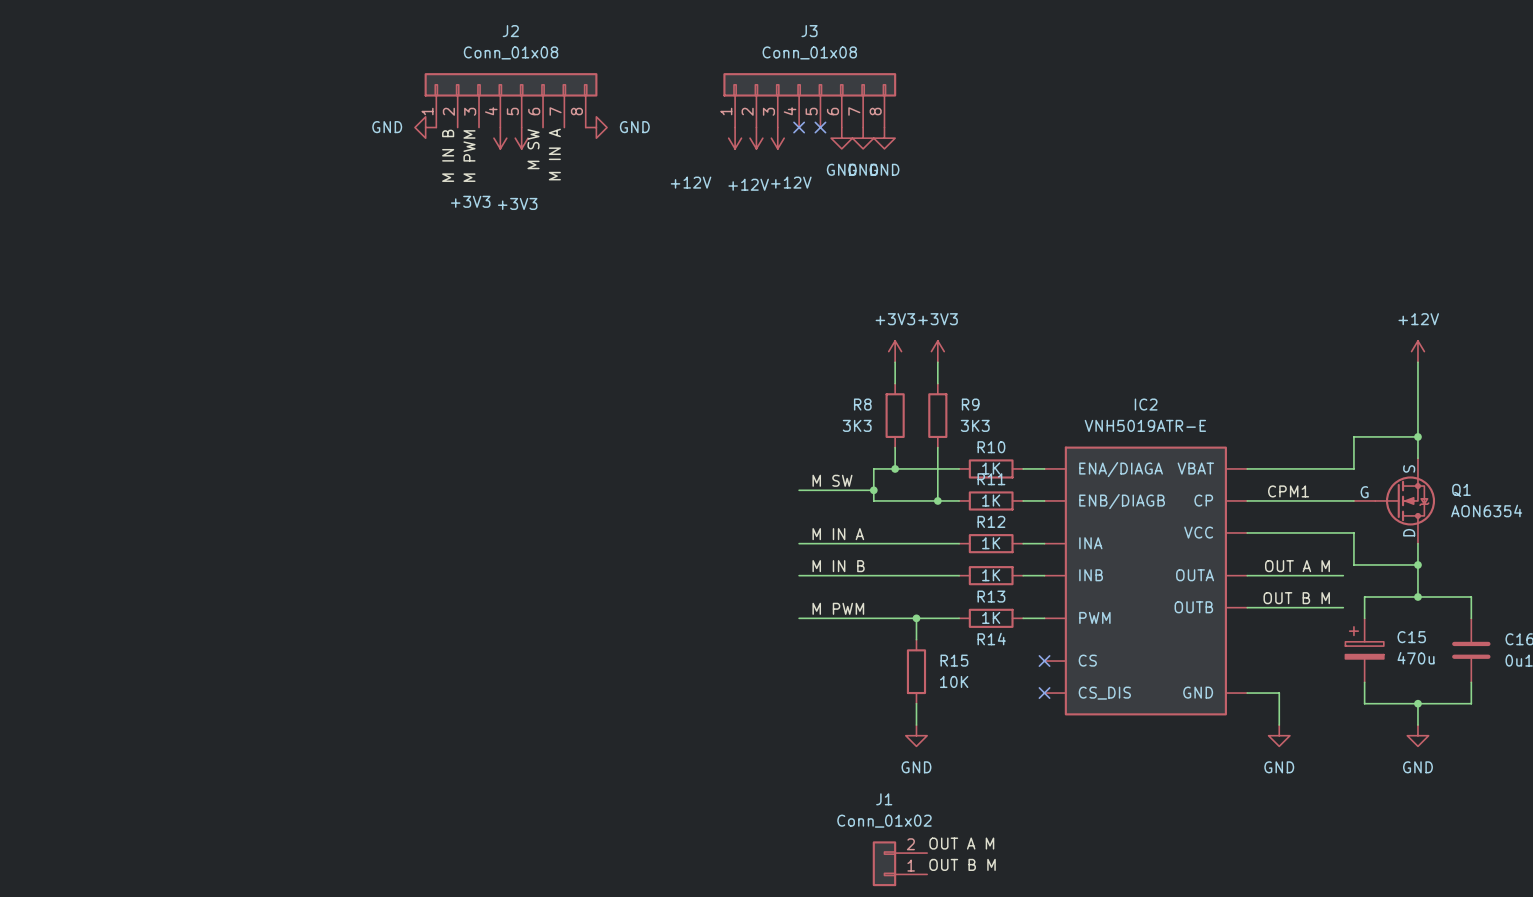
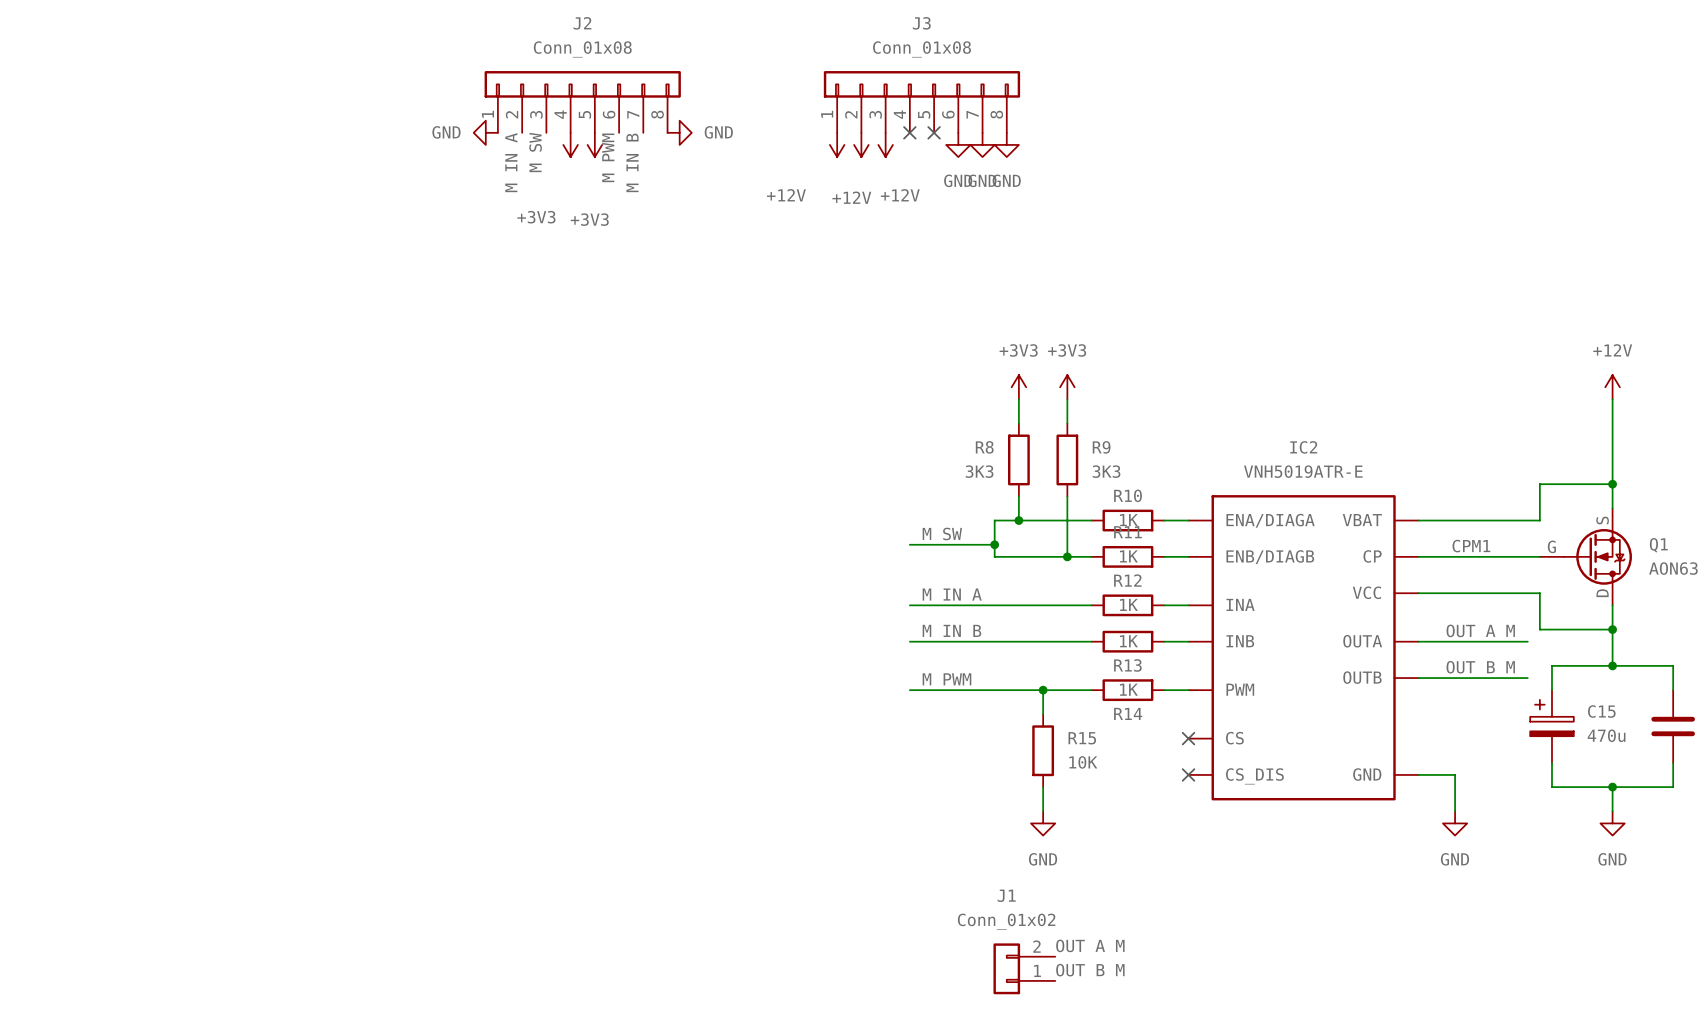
label: M SW (533, 149) -> M PWM (608, 157)
label: M IN A (554, 154) -> M IN B (632, 162)
label: M IN B (448, 155) -> M IN A (511, 162)
label: M PWM (469, 156) -> M SW (535, 152)

